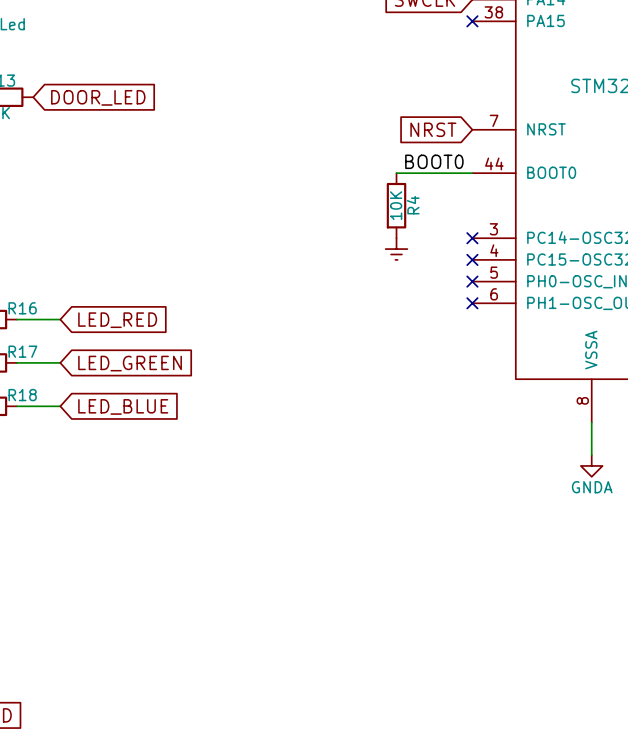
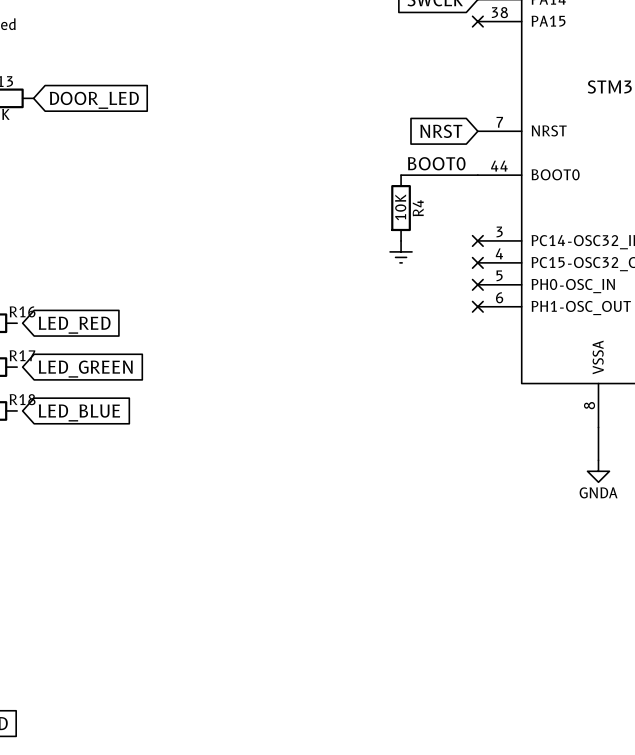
wire: (16, 319) (60, 319) -> none
global label position: LED_RED (117, 320) -> LED_RED (74, 325)
wire: (16, 362) (60, 362) -> none
global label position: LED_GREEN (130, 363) -> LED_GREEN (85, 369)
wire: (16, 406) (60, 406) -> none
global label position: LED_BLUE (123, 406) -> LED_BLUE (79, 412)

